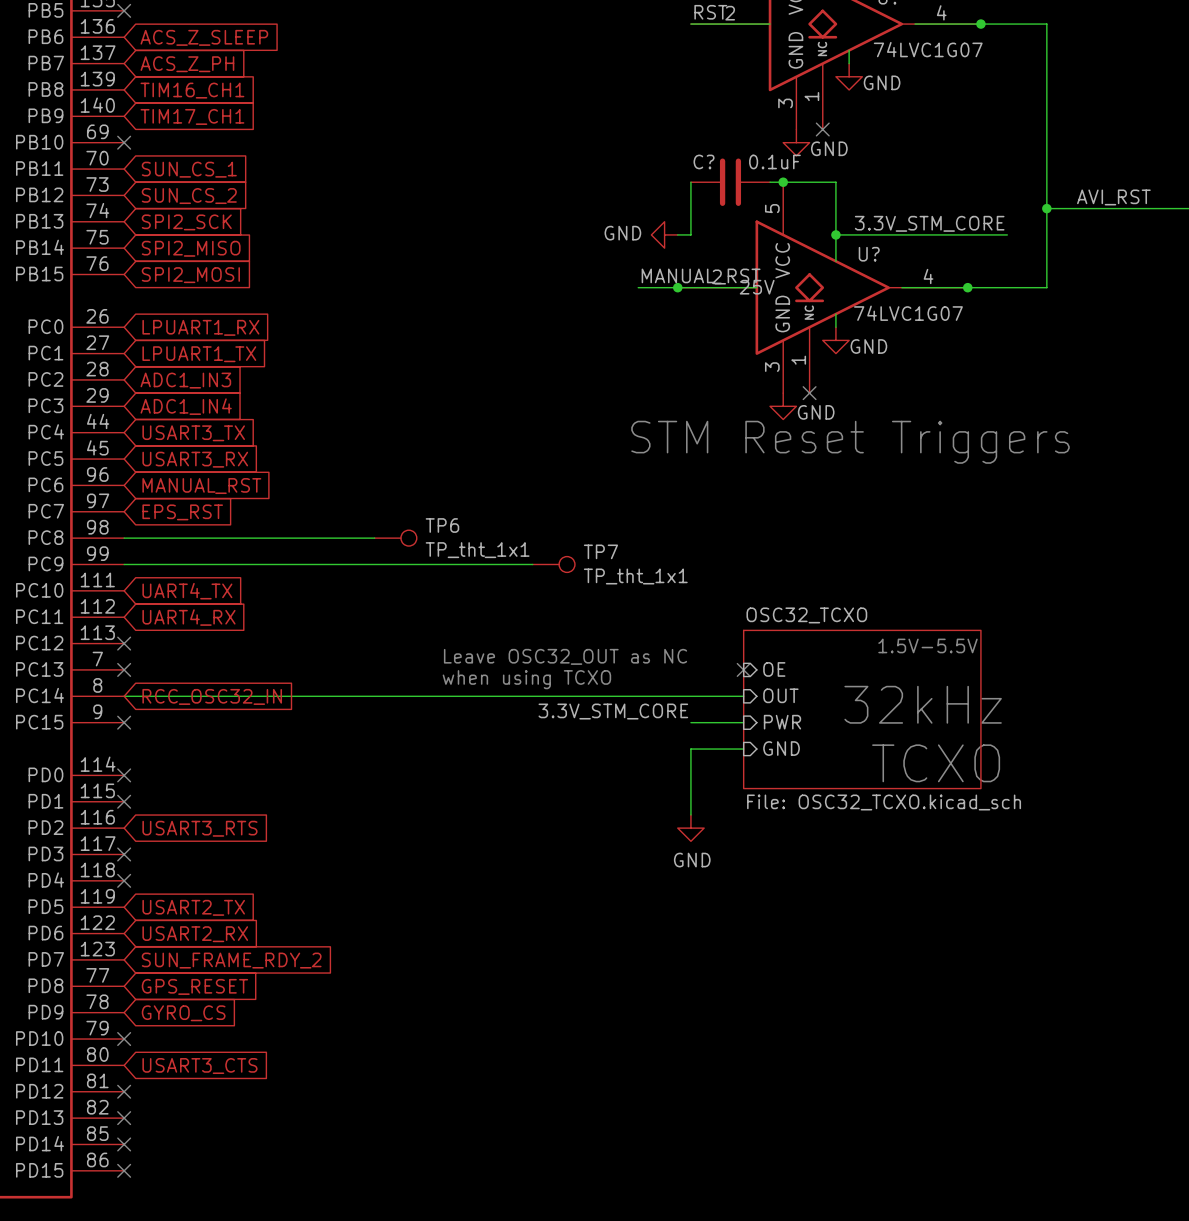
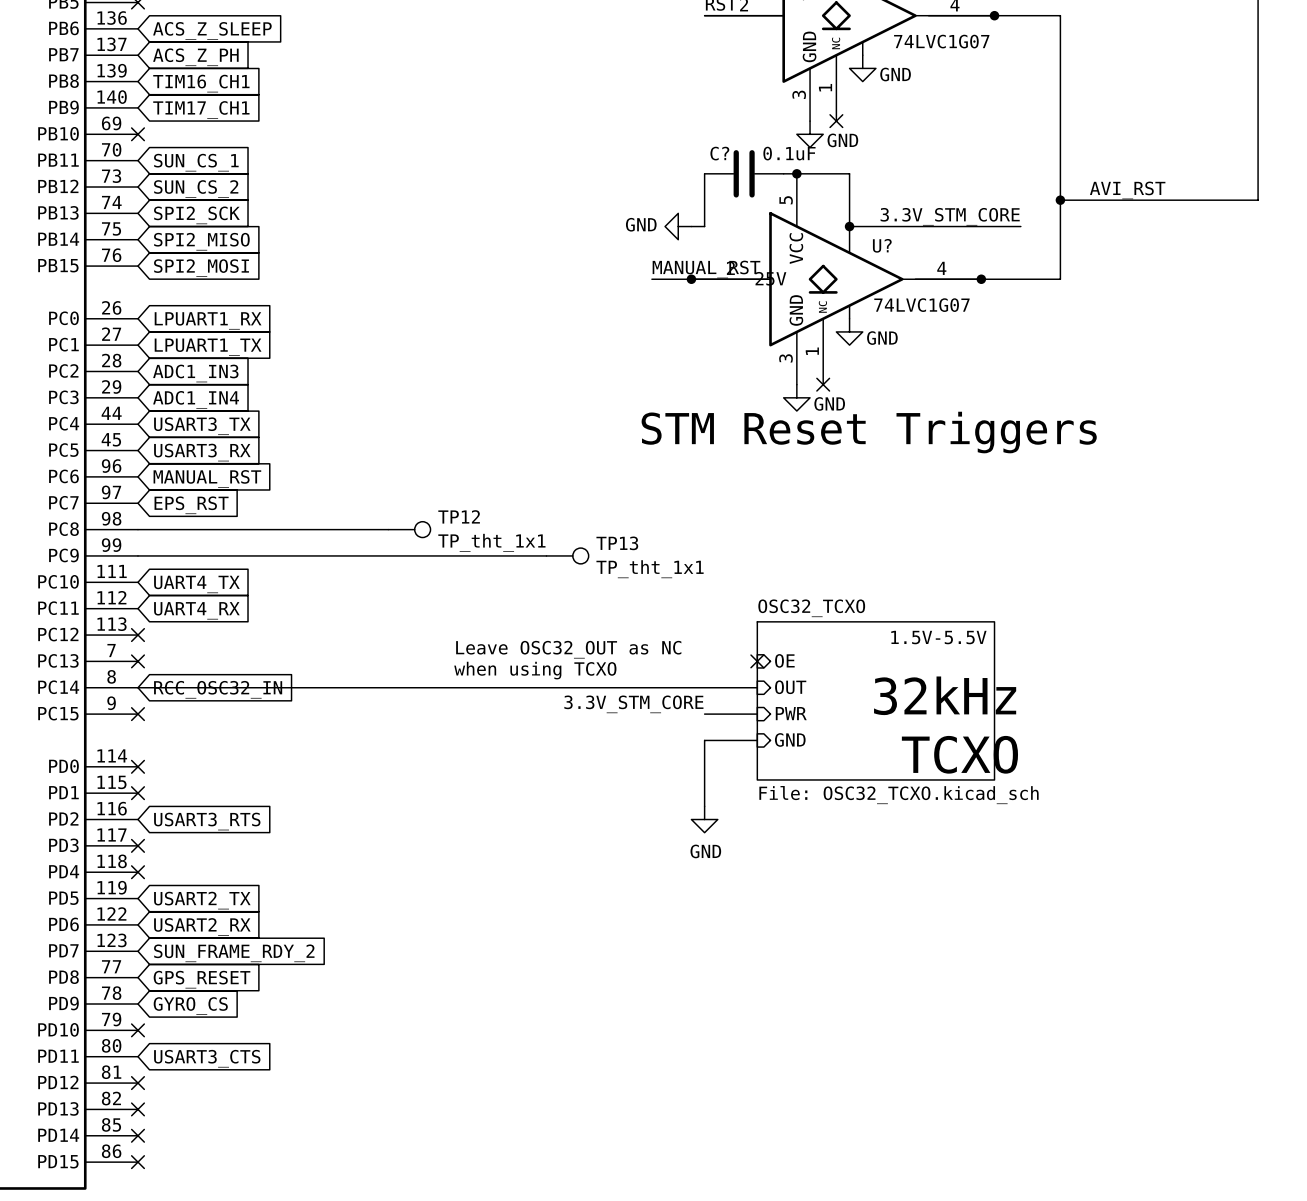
TP6 name: TP6 (442, 525) -> TP12 (459, 516)
TP7 name: TP7 (600, 551) -> TP13 (617, 543)

